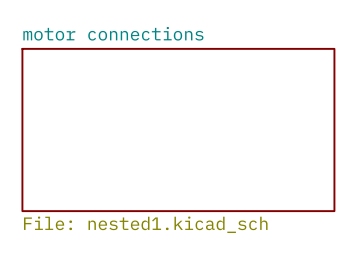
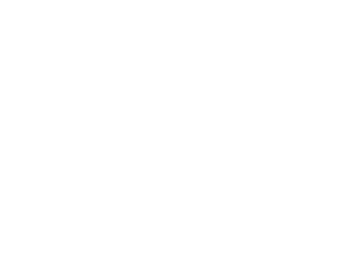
sheet motor connections: File: nested1.kicad_sch (178, 130) -> none

